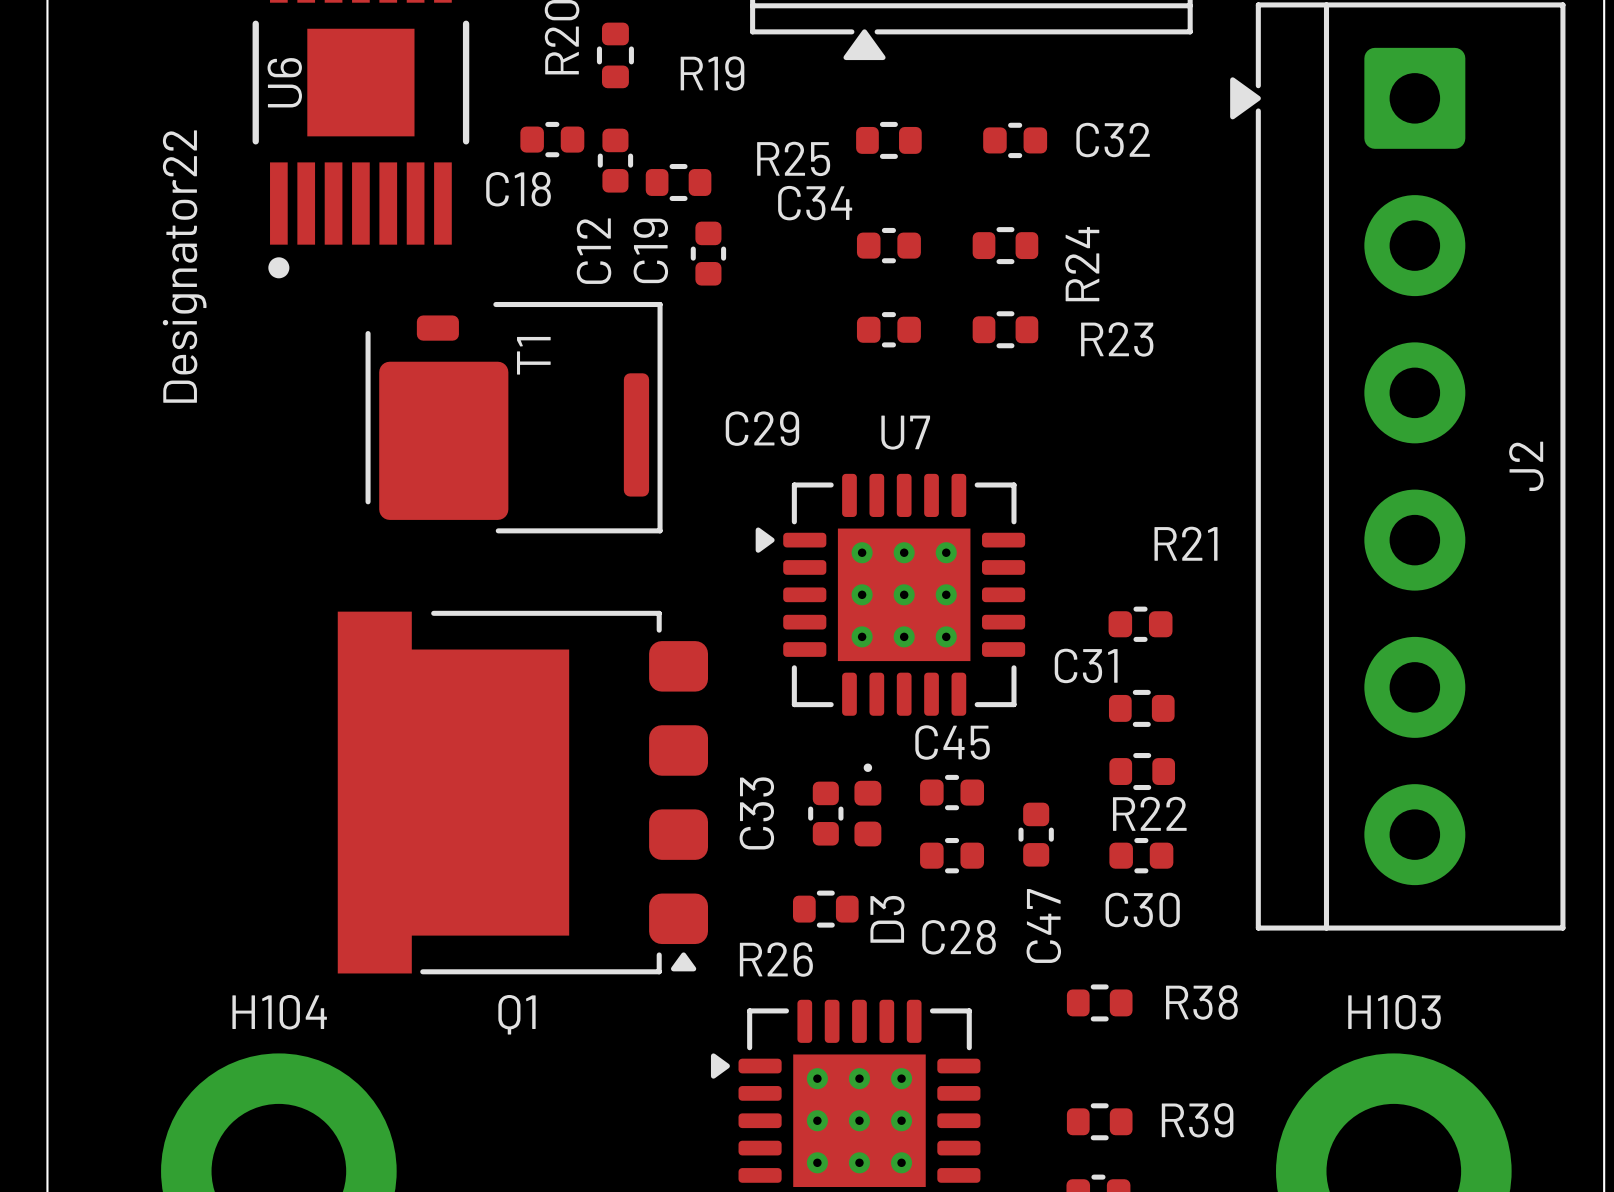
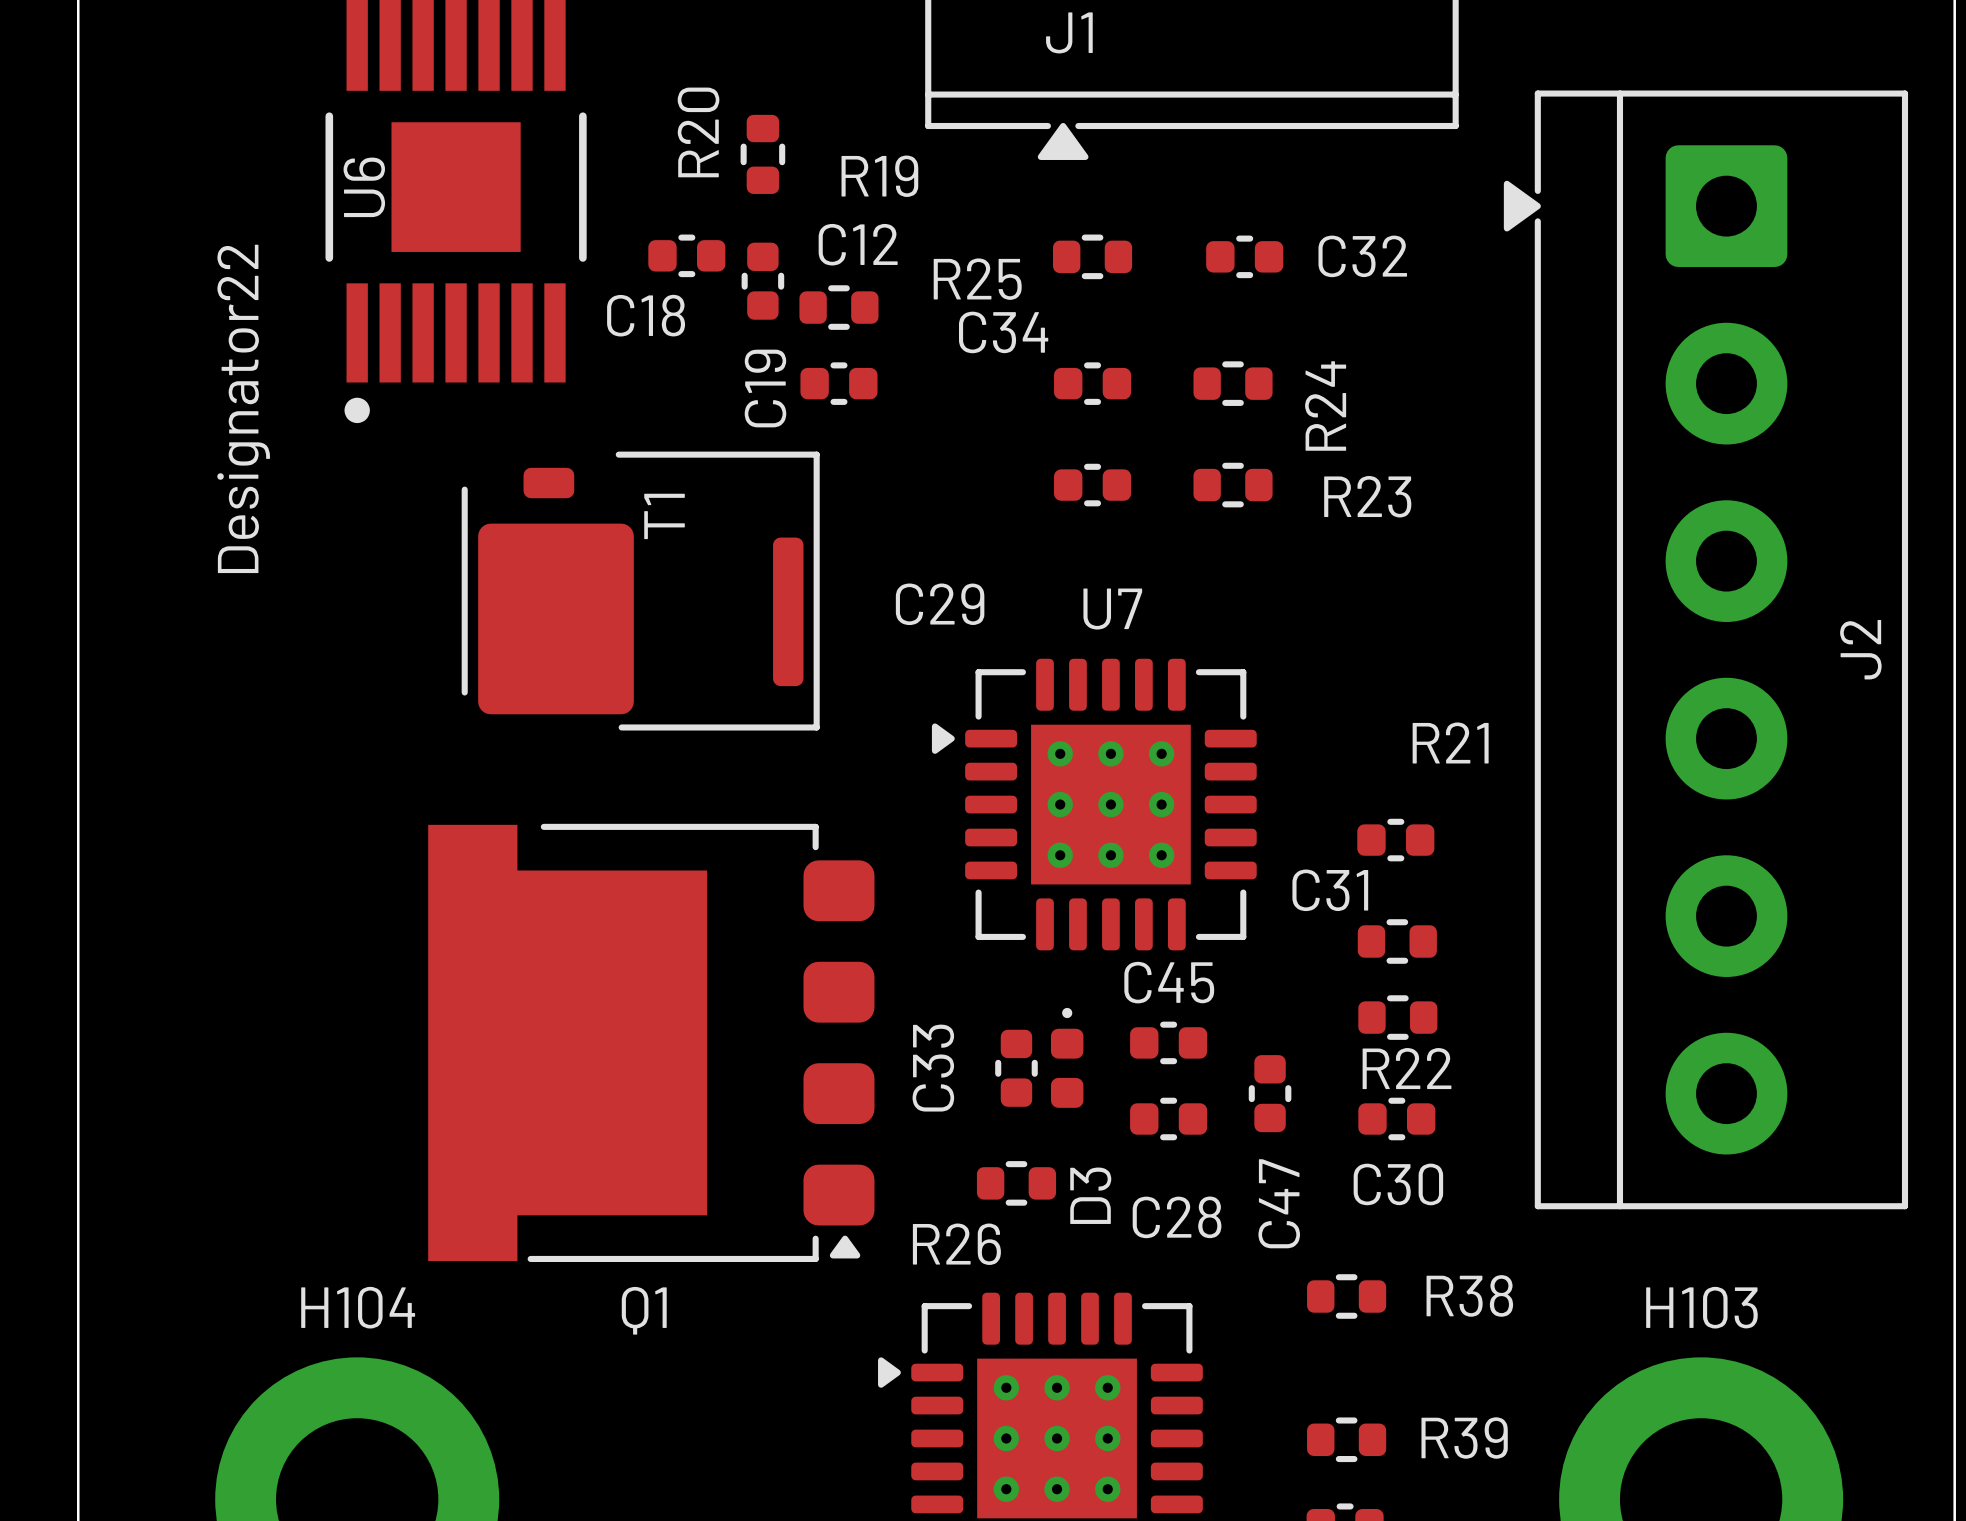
C19 name position: C19 (650, 250) -> C19 (765, 388)
C12 rotation: 0° (708, 253) -> 90° clockwise (838, 383)

